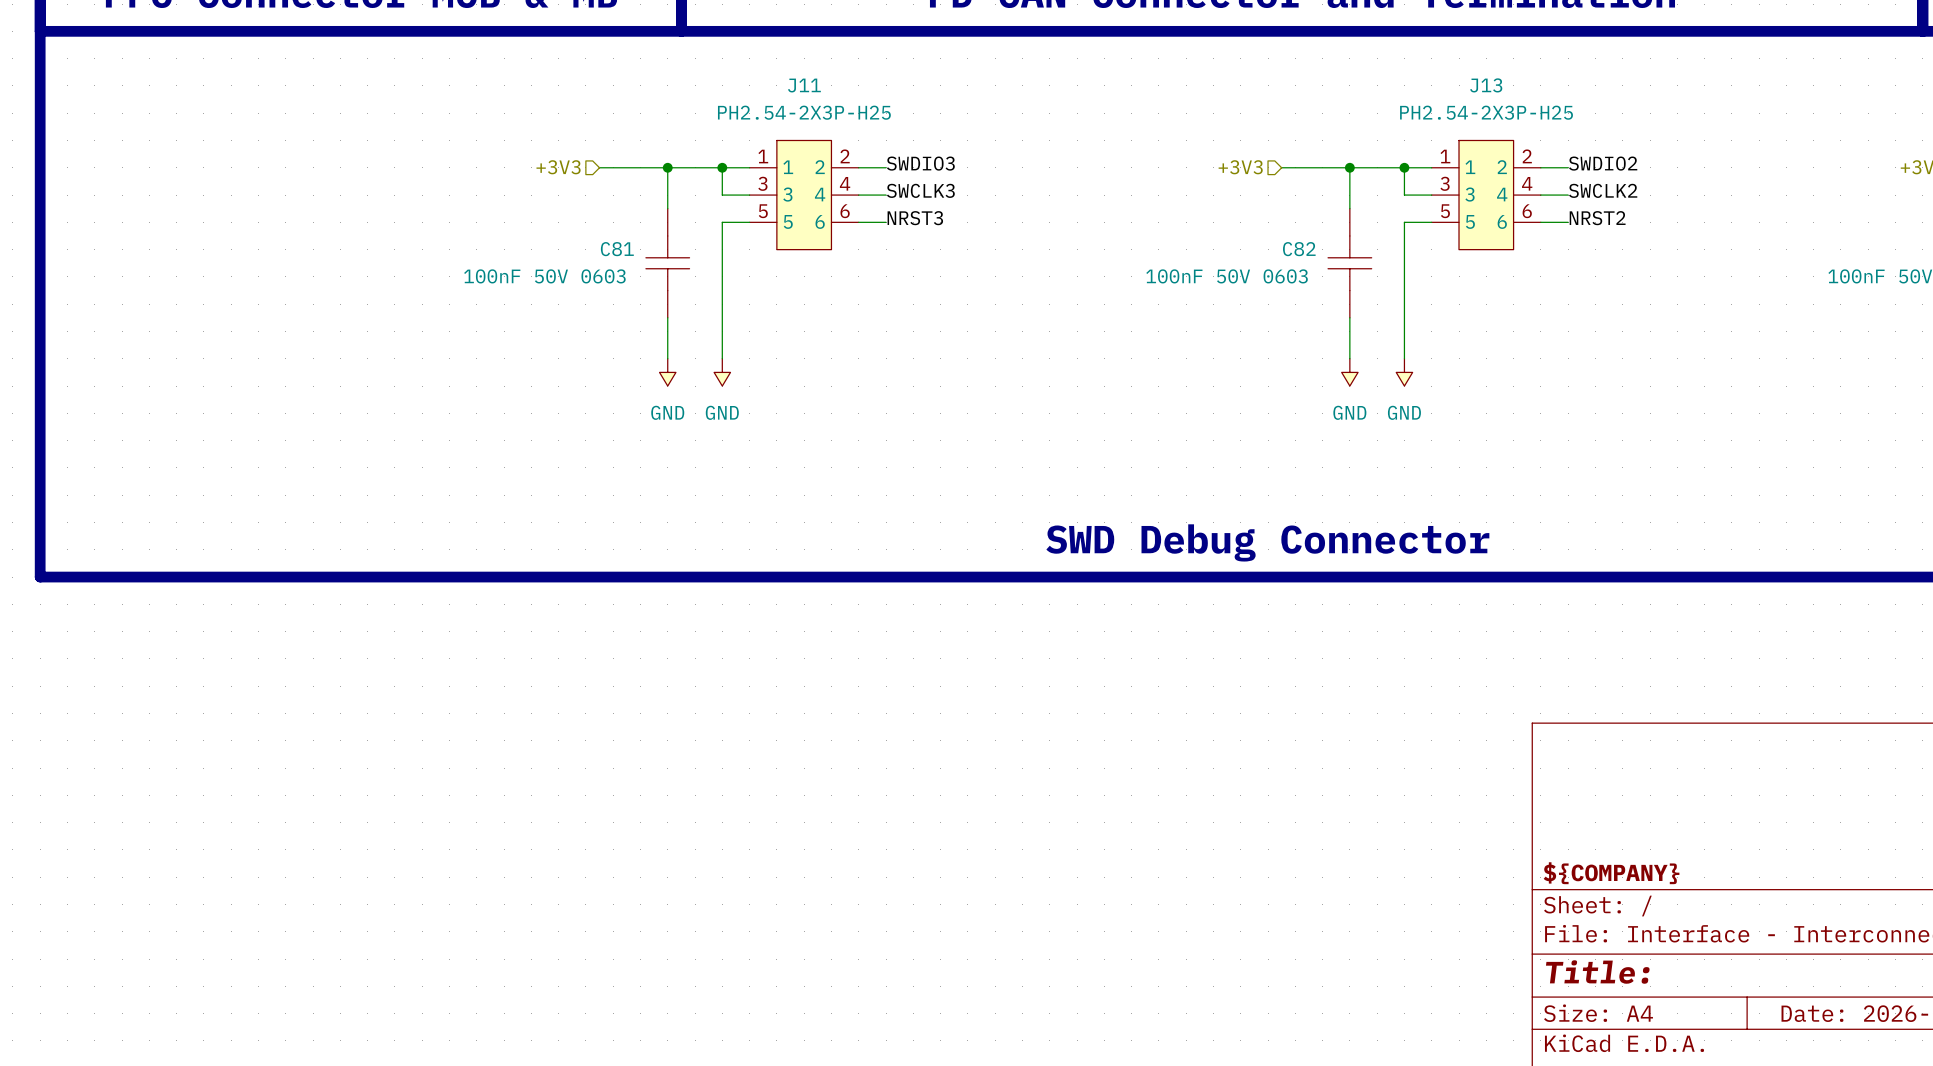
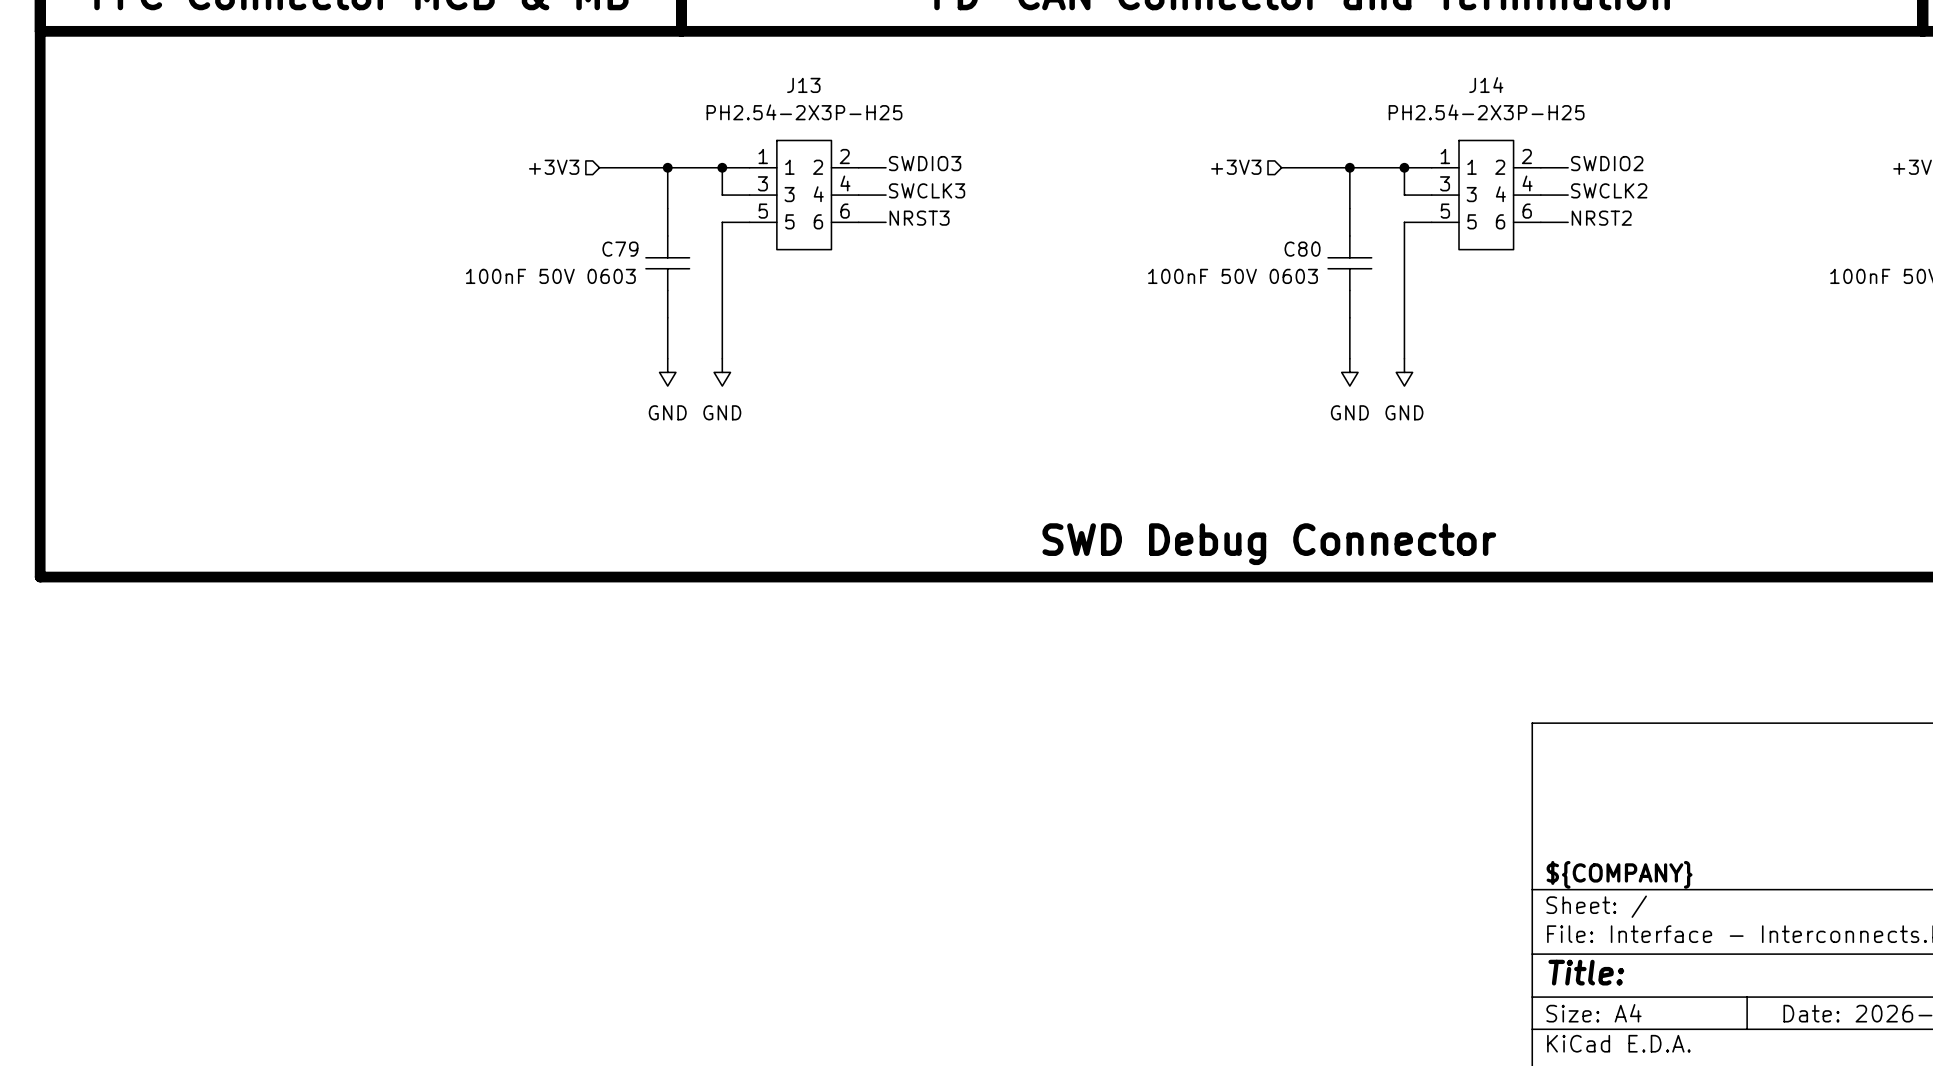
J11 name: J11 (804, 85) -> J13 (803, 85)
J13 name: J13 (1486, 85) -> J14 (1486, 85)
C81 name: C81 (617, 249) -> C79 (620, 249)
C82 name: C82 (1299, 249) -> C80 (1302, 249)

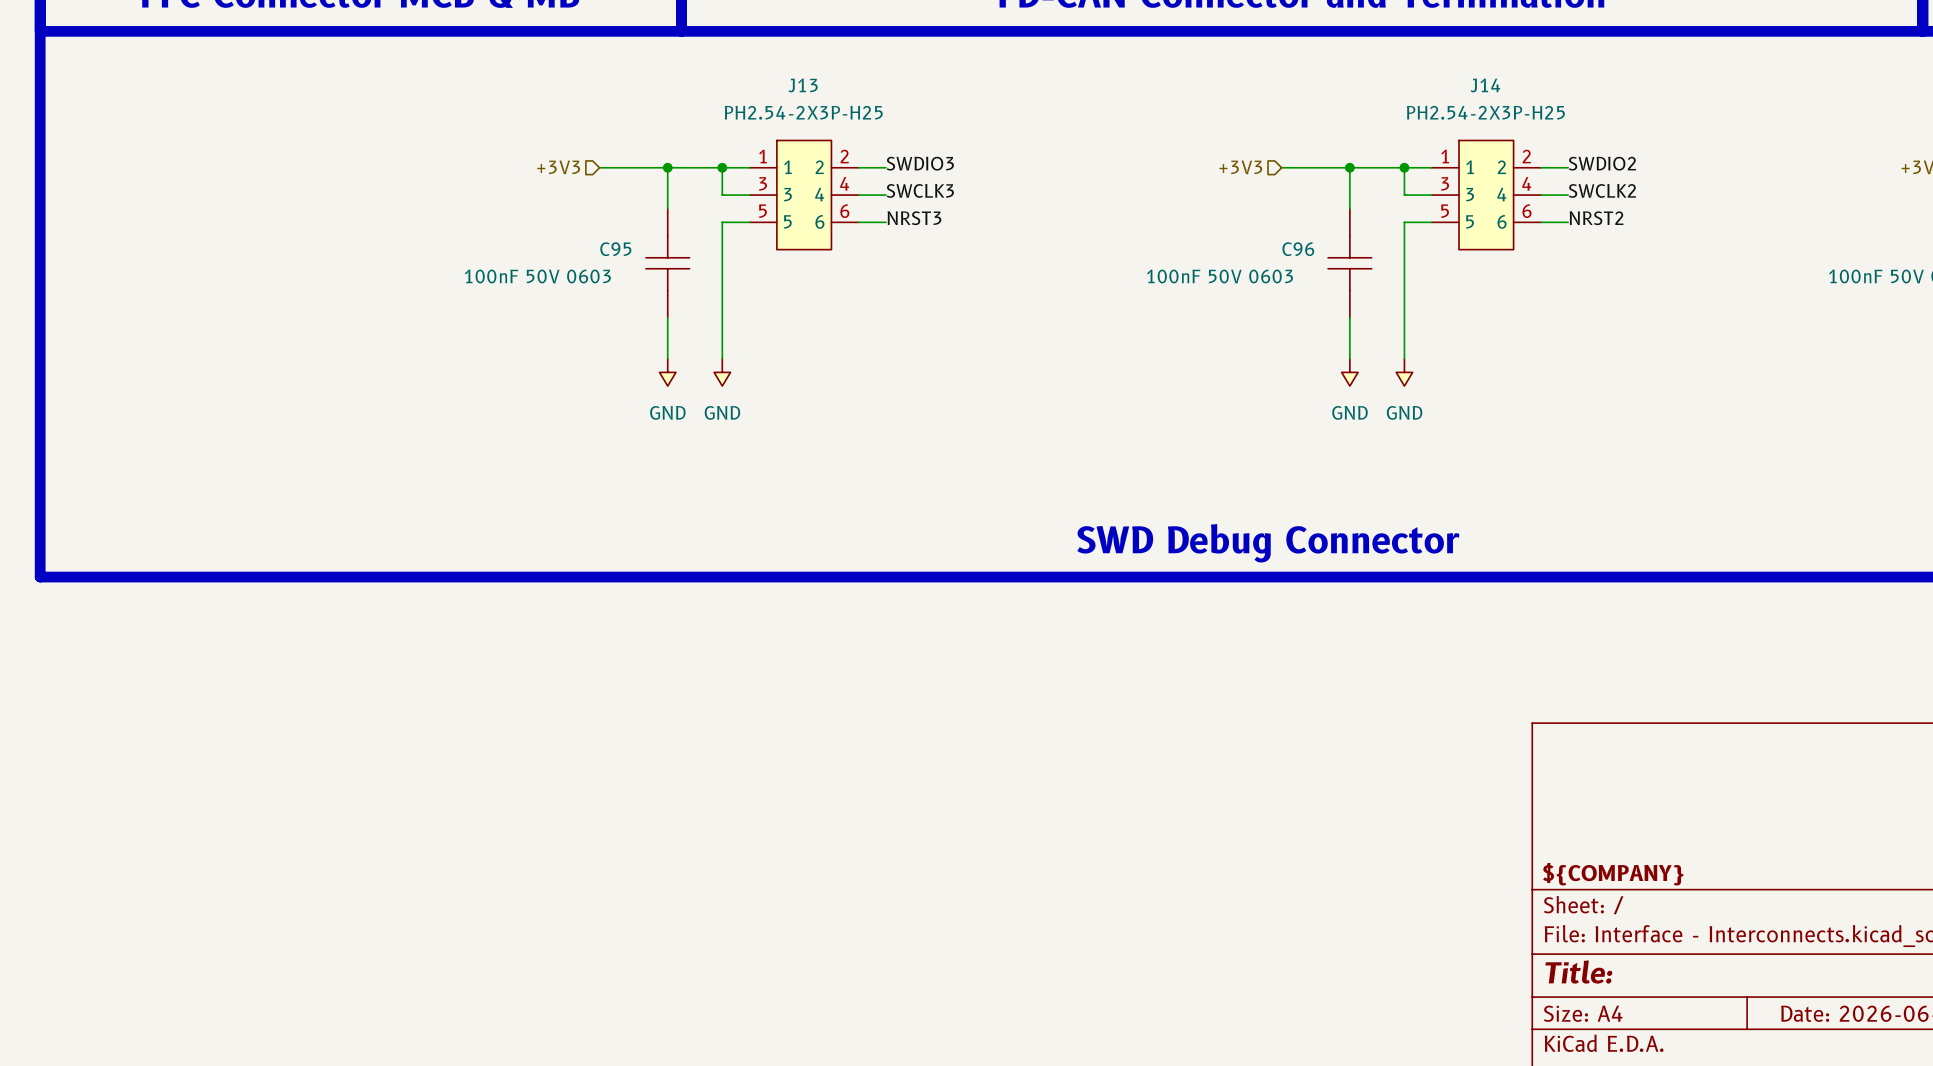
C79 name: C79 (620, 249) -> C95 (615, 249)
C80 name: C80 (1302, 249) -> C96 (1298, 249)

